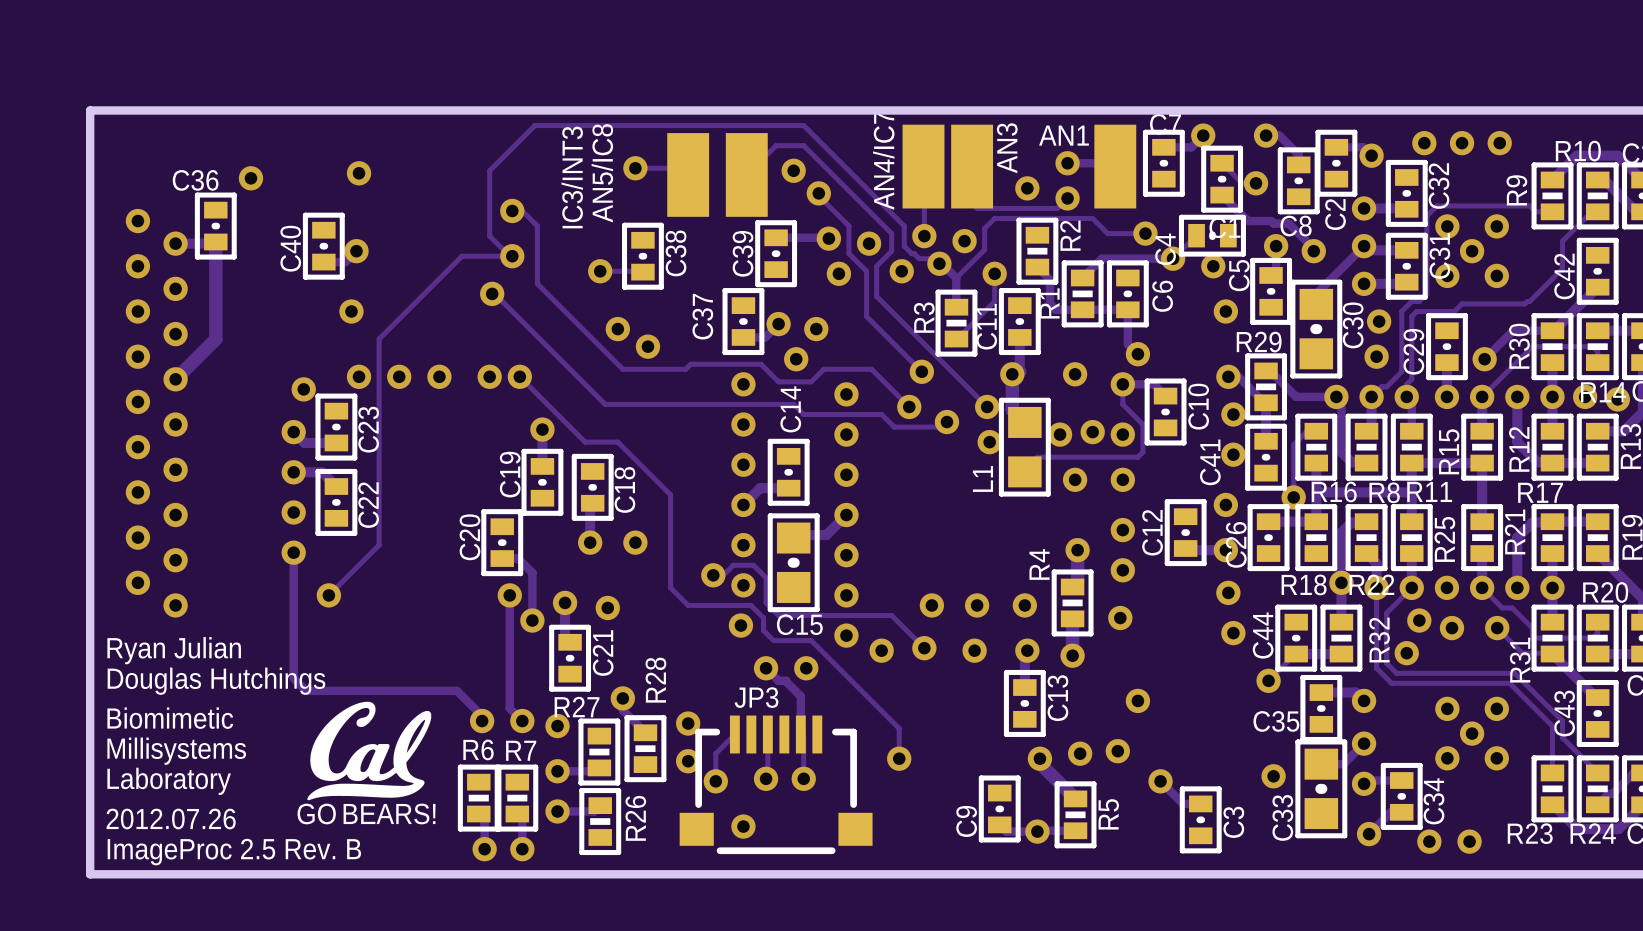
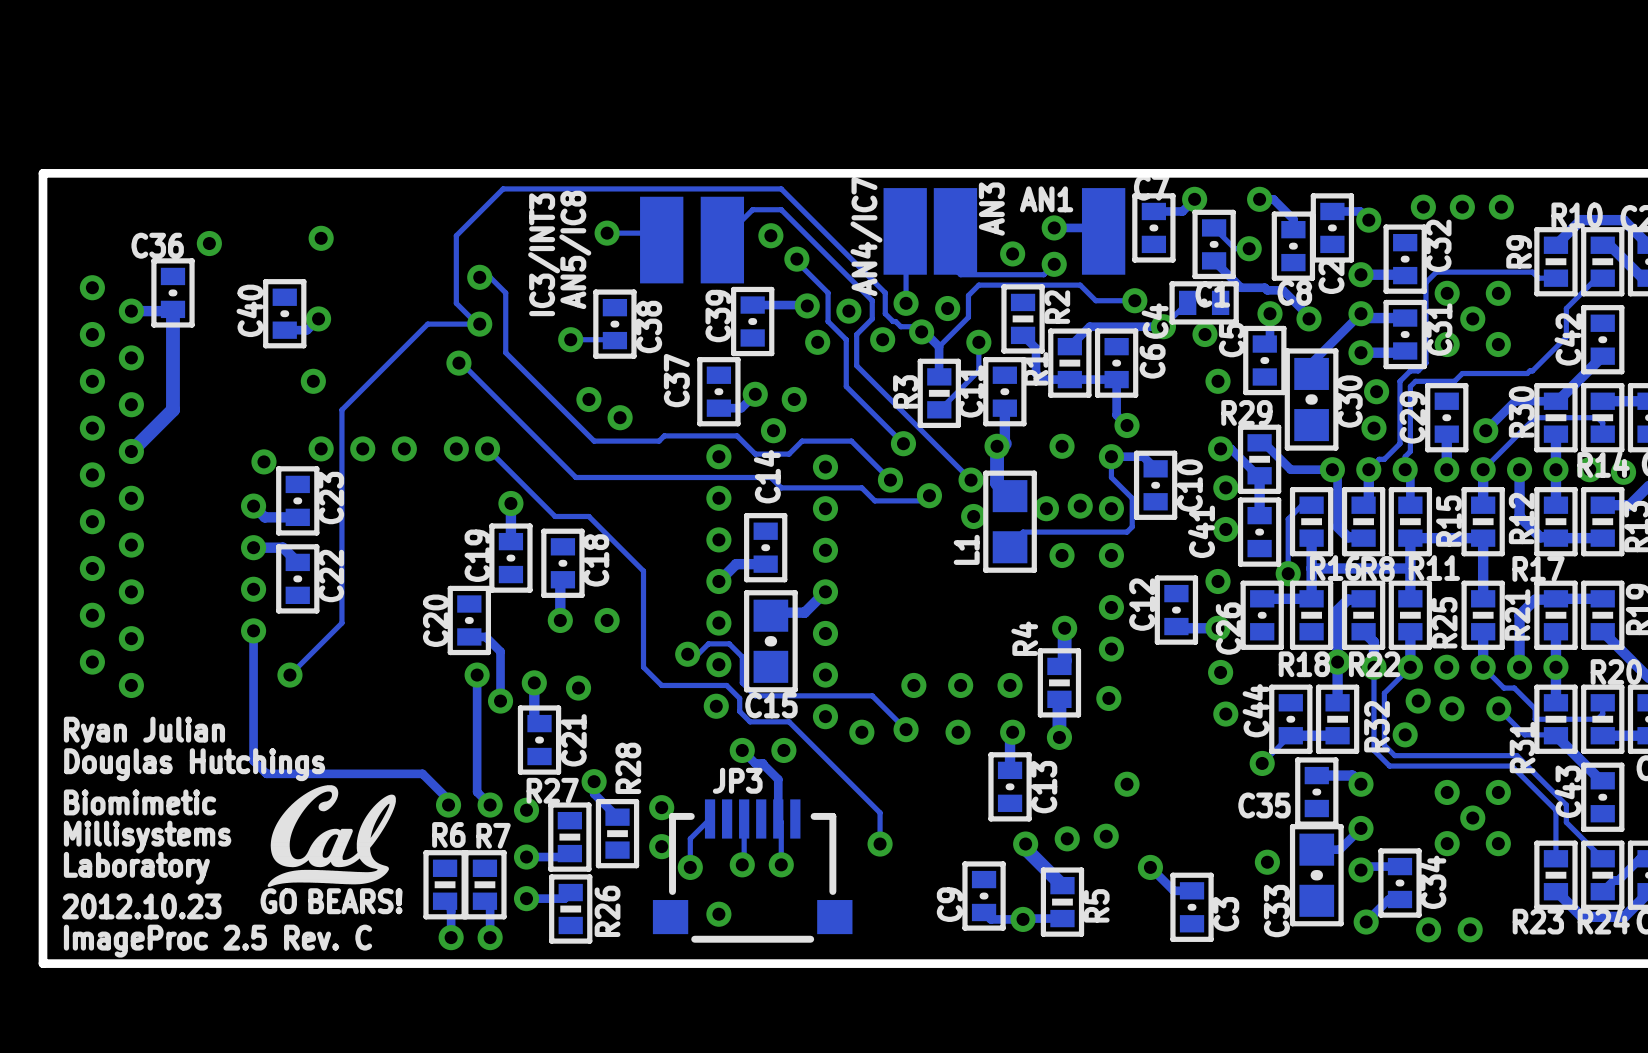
text: 2012.07.26 (171, 819) -> 2012.10.23 (141, 906)
text: ImageProc 2.5 Rev. B (234, 852) -> ImageProc 2.5 Rev. C (217, 941)

